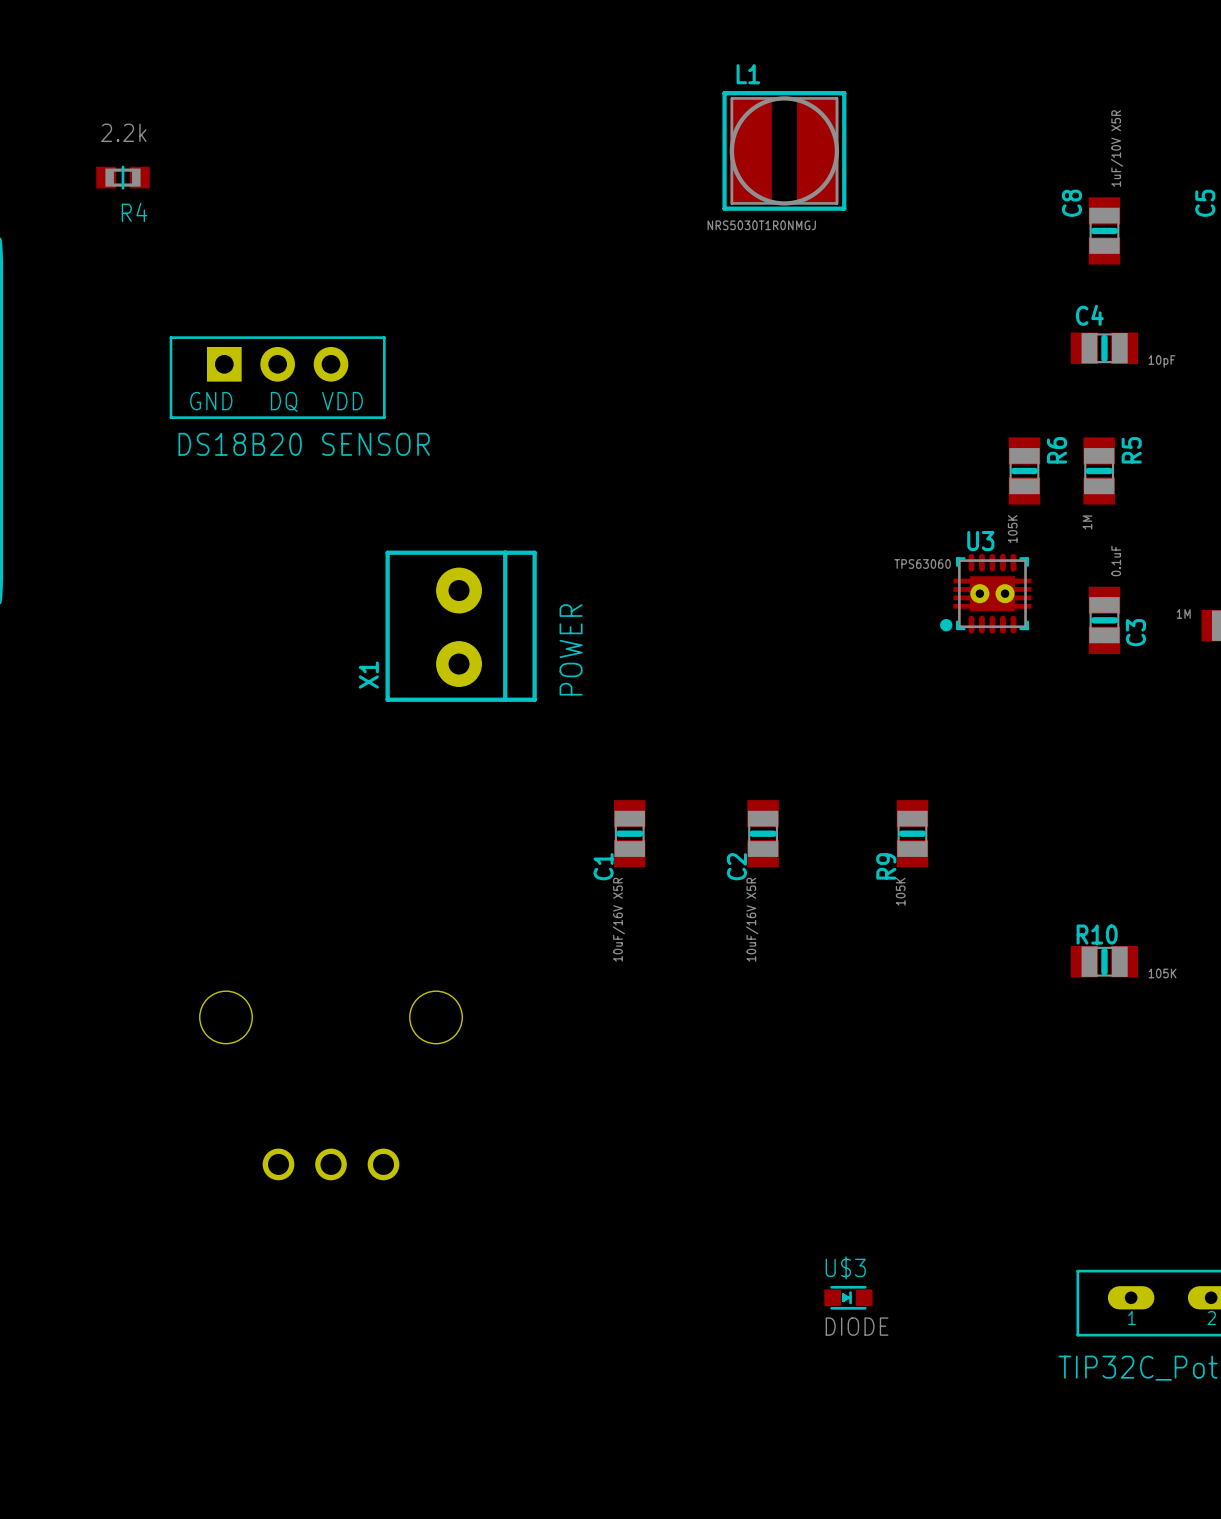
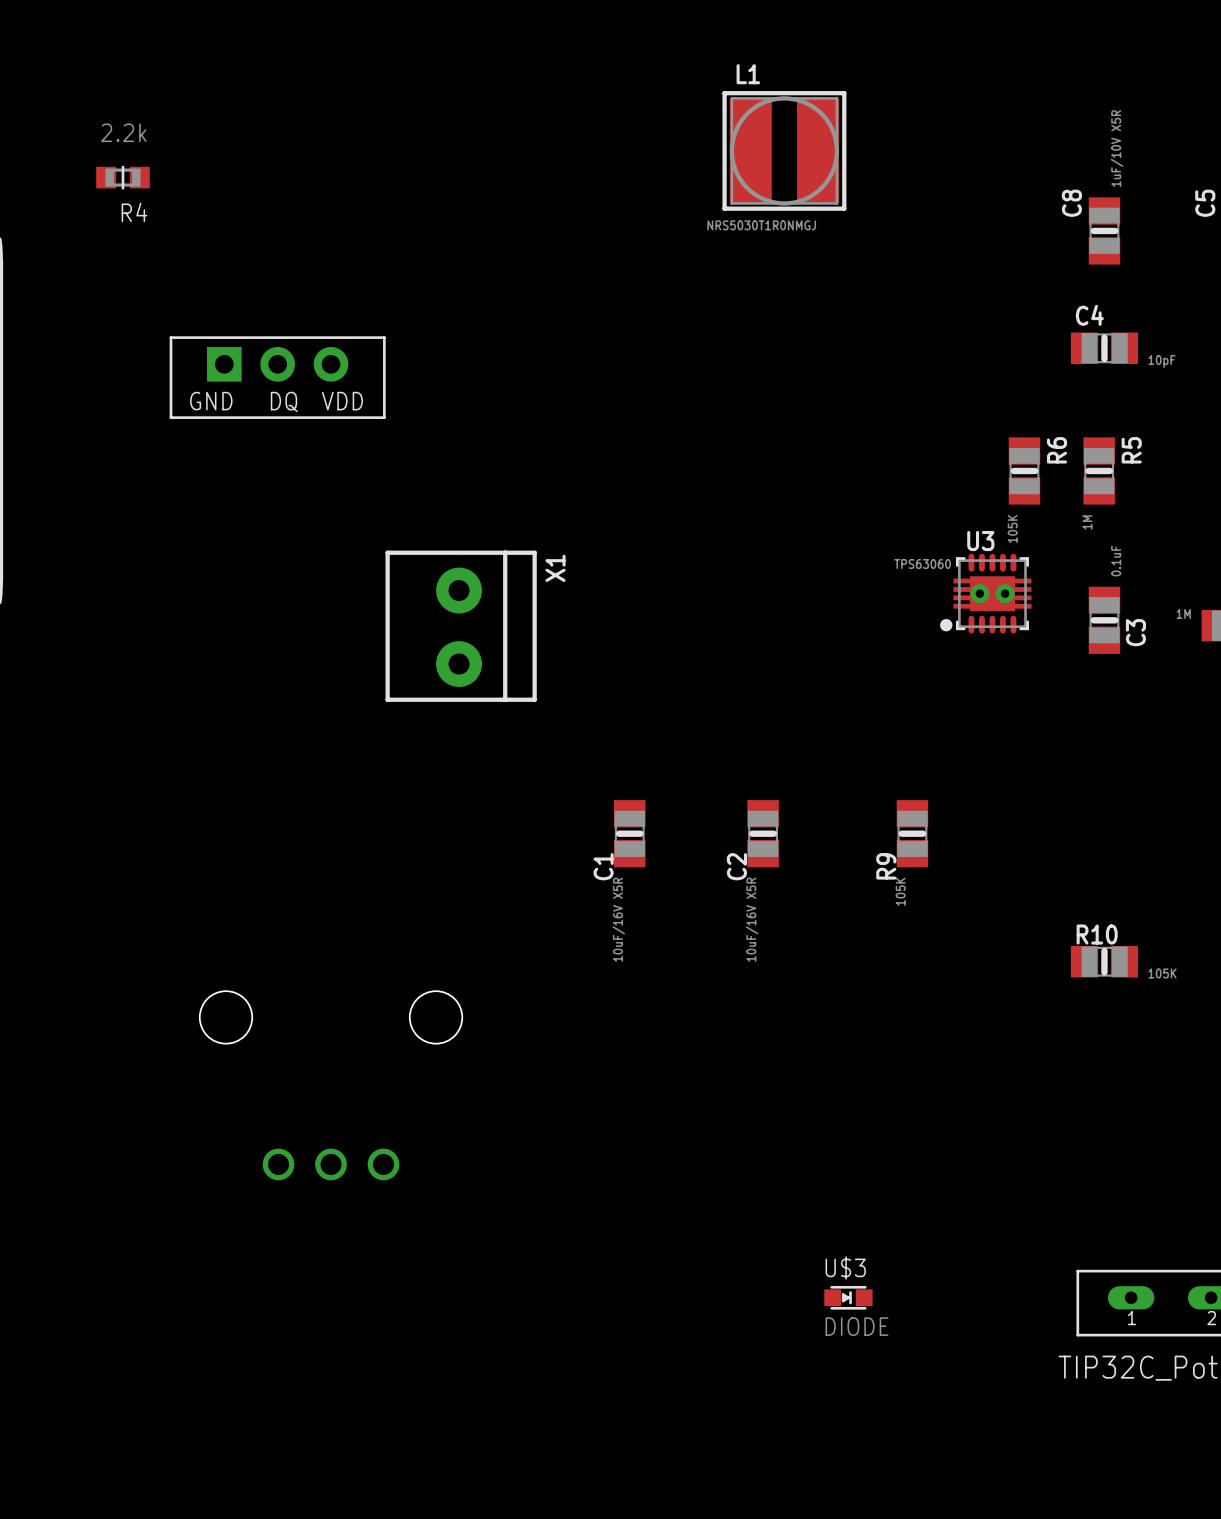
text: DS18B20 SENSOR (304, 444) -> none
text: POWER (571, 649) -> none
X1 name position: X1 (368, 675) -> X1 (555, 568)

